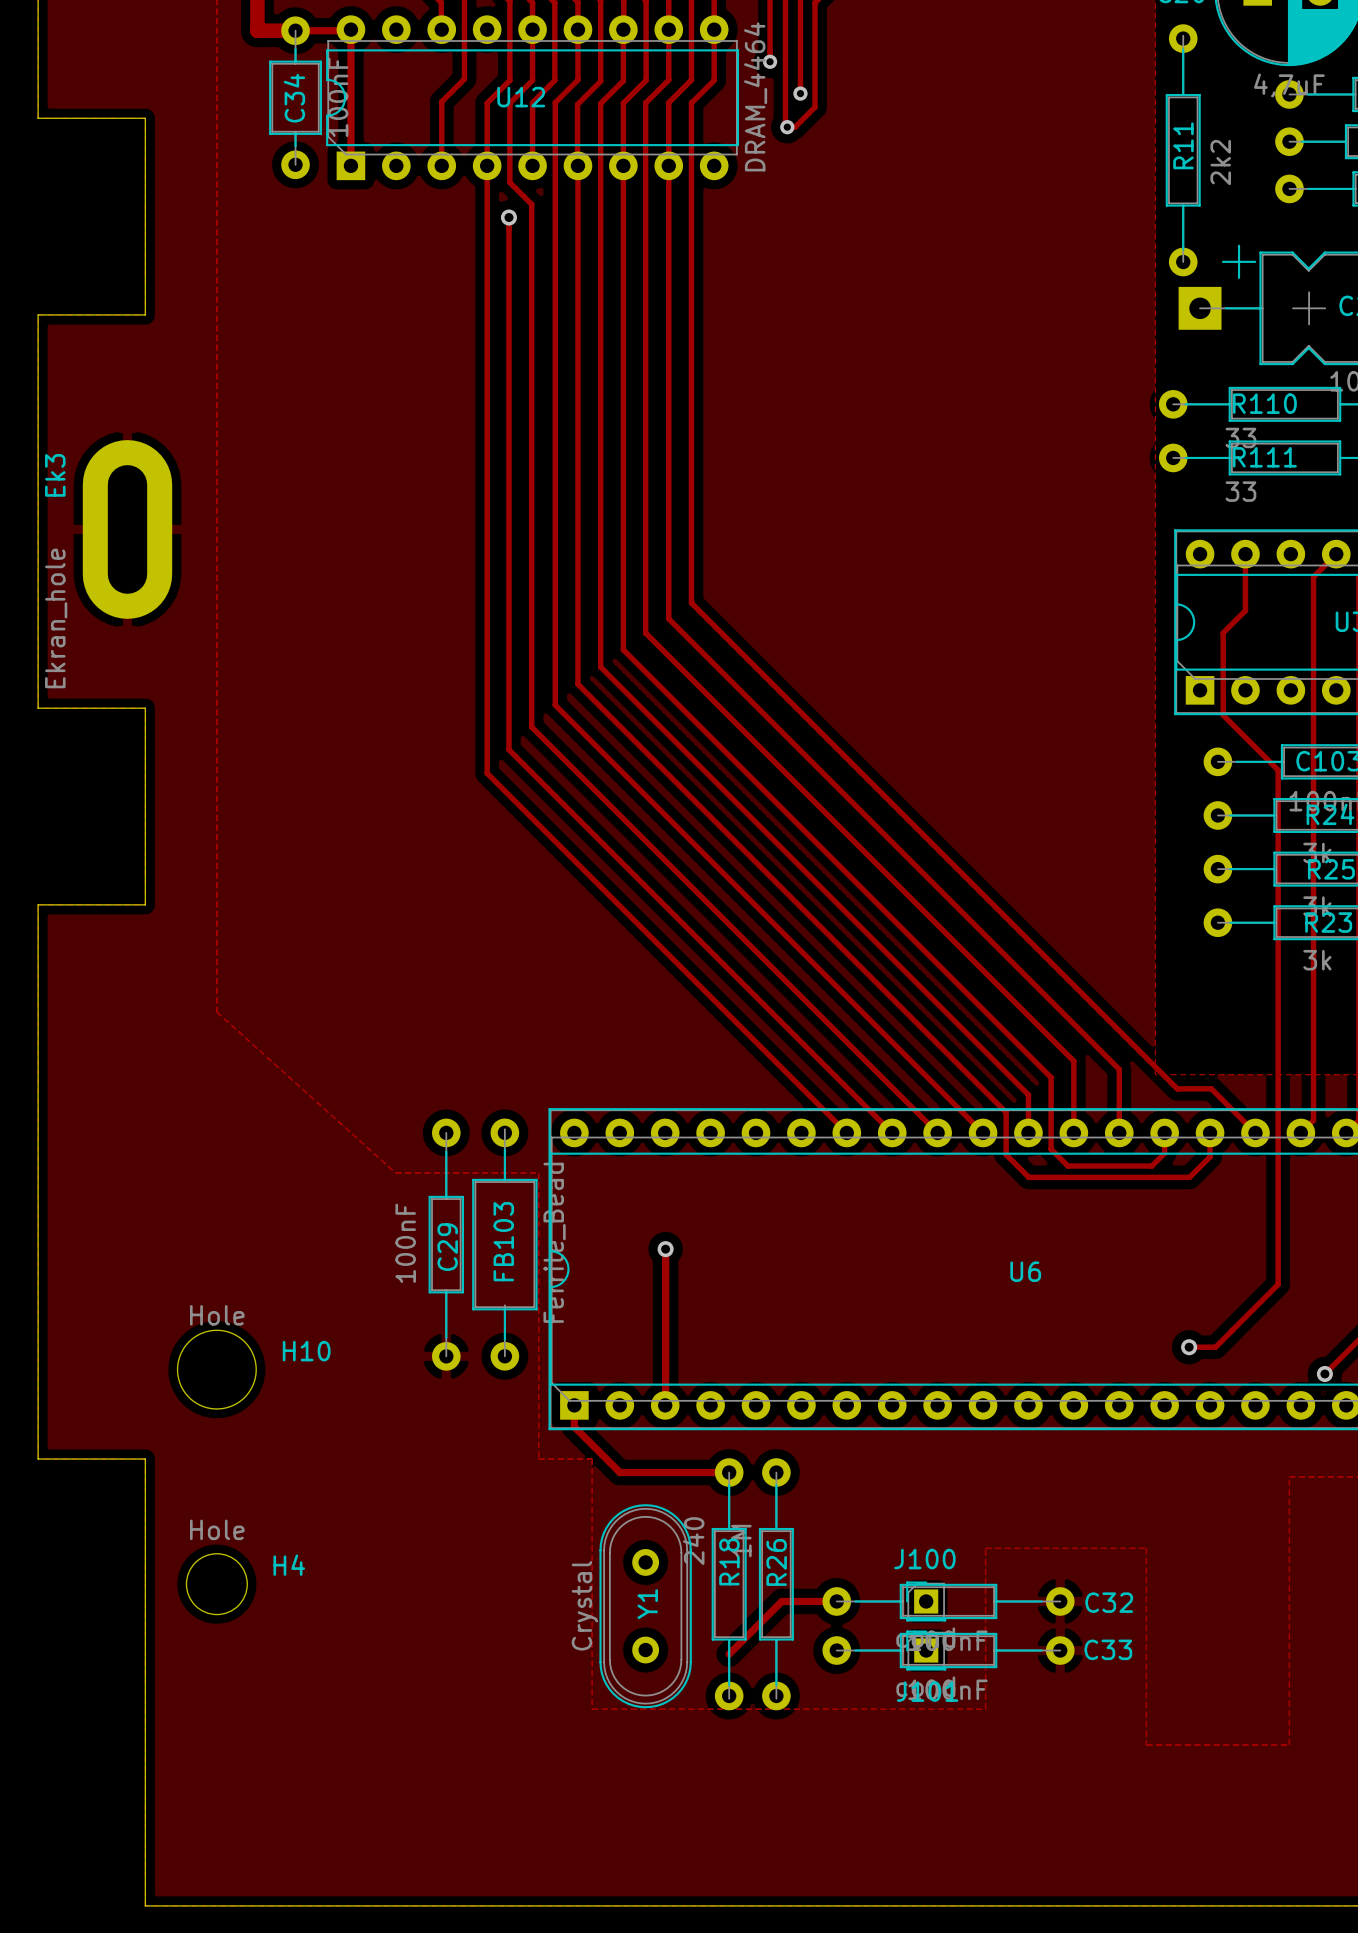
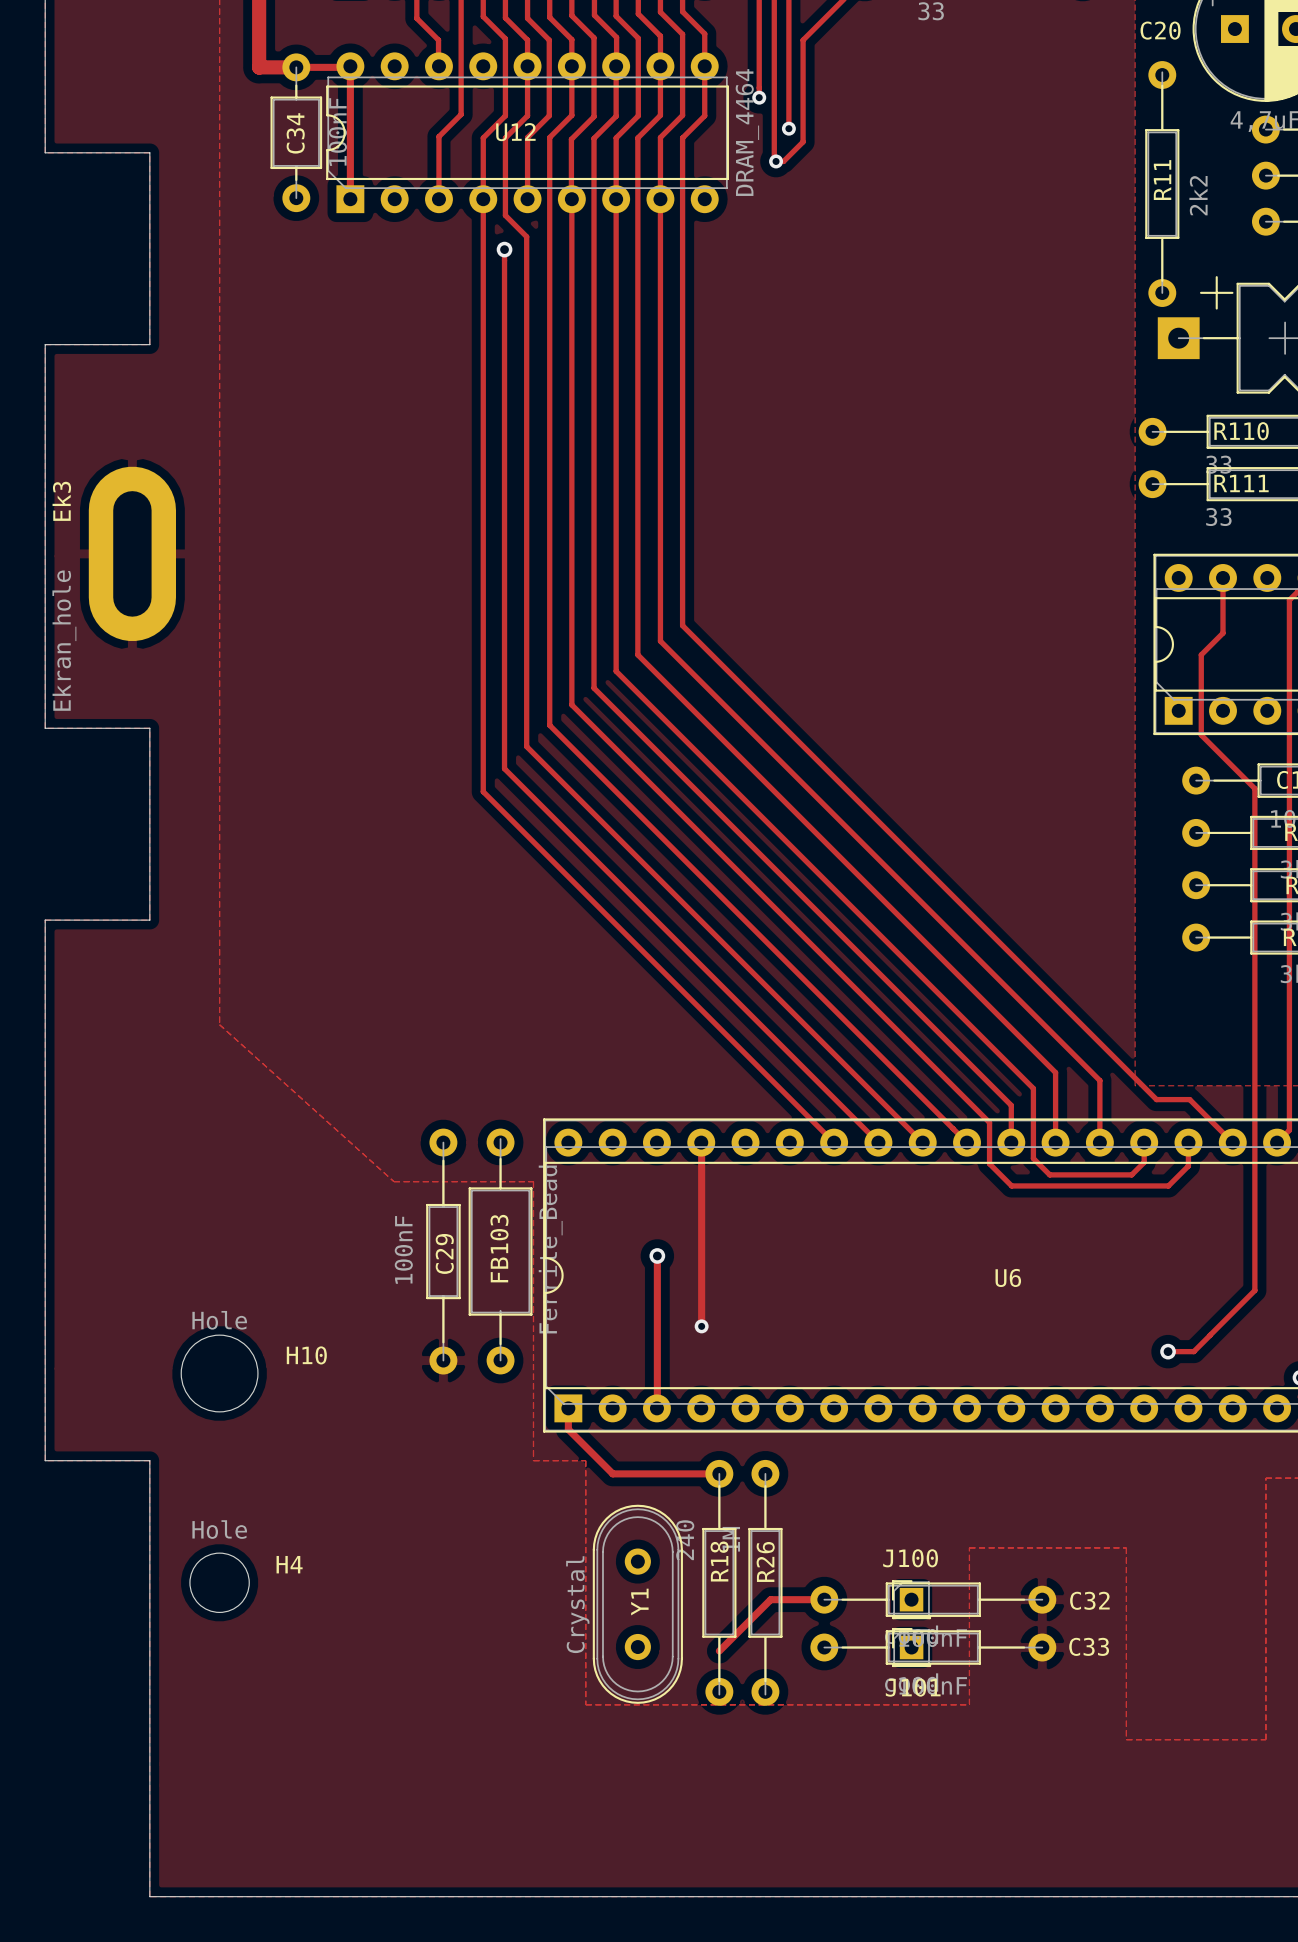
track: none -> (701, 1142) (701, 1326)
via: none -> (701, 1326)

